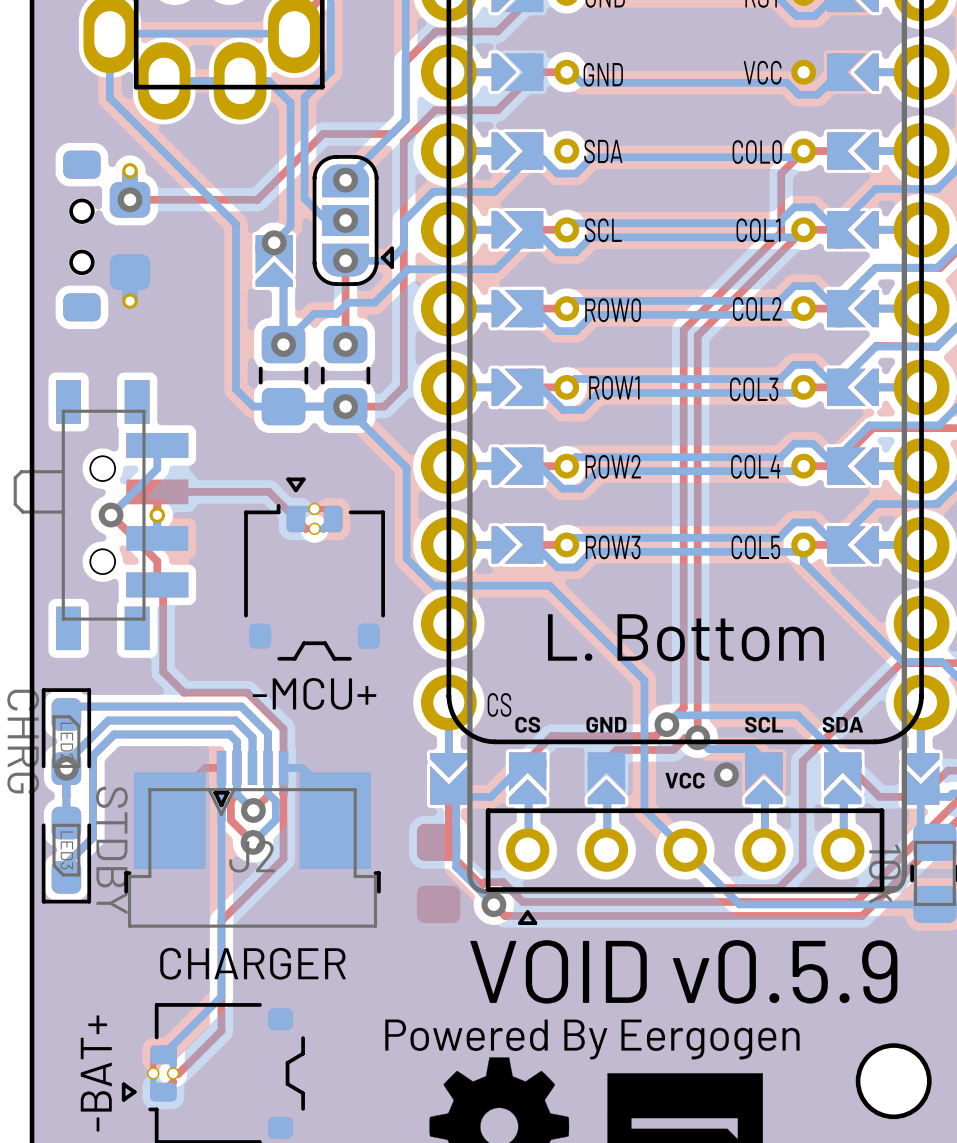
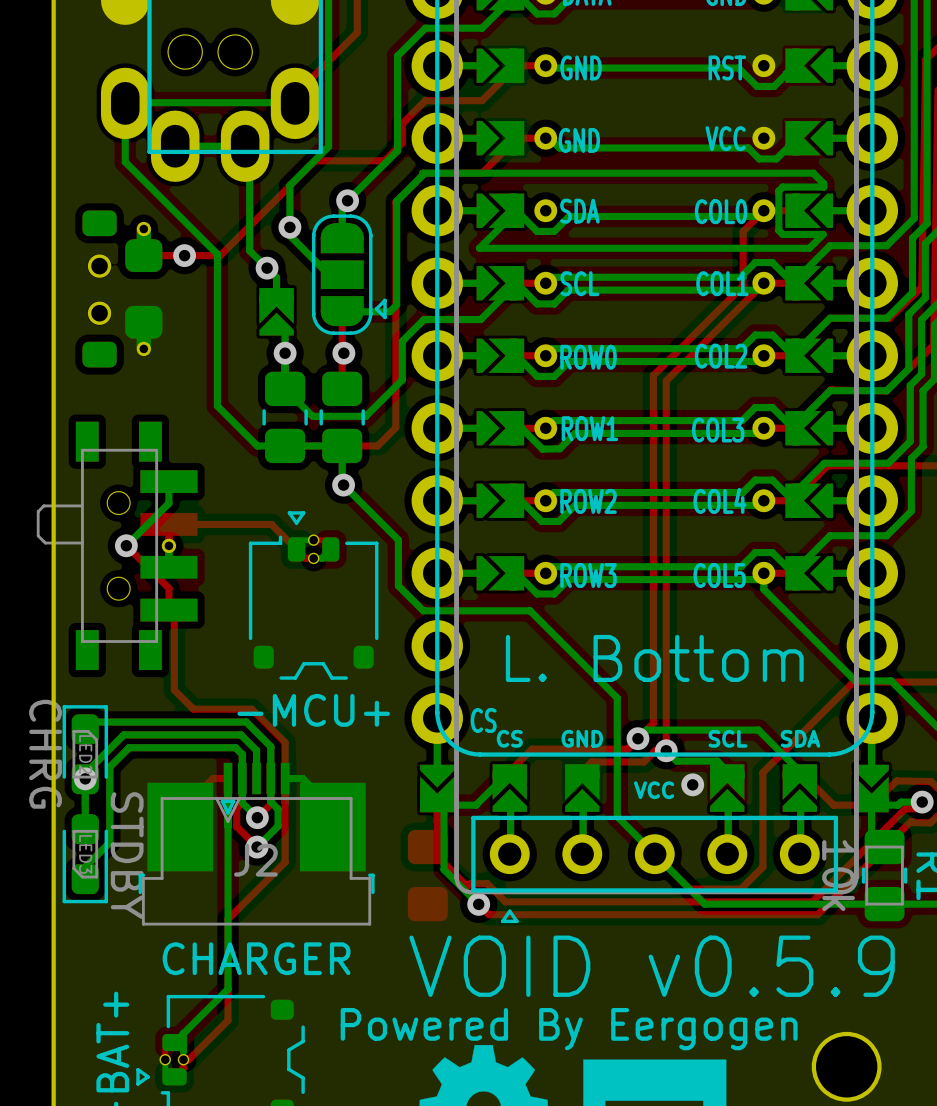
top track: (435, 31) (405, 61) (405, 120) (391, 134) (323, 134) (257, 199) (213, 199) -> (425, 100) (402, 123) (402, 143) (384, 160) (315, 160) (220, 255)
bottom track: (330, 71) (304, 97) (304, 198) (326, 220) -> (328, 137) (328, 146) (289, 185) (289, 235) (328, 274) (342, 274)
bottom track: (240, 80) (268, 80) (290, 102) (290, 226) (274, 242) -> (245, 146) (249, 150) (249, 250) (276, 277) (276, 295)
bottom track: (405, 85) (405, 120) (345, 180) -> (397, 150) (342, 206) (342, 237)
via: none -> (347, 200)
via: none -> (289, 227)
via: (345, 180) -> none
bottom track: (494, 191) (433, 191) (404, 220) (404, 246) (389, 260) -> (479, 248) (809, 248) (823, 234) (782, 234) (778, 230) (778, 190) (782, 187) (823, 187) (823, 183) (813, 173) (422, 173) (396, 201) (396, 304) (389, 311) (382, 311)
bottom track: (209, 198) (236, 224) (236, 389) (253, 406) -> (217, 254) (217, 406) (257, 445)
via position: (130, 199) -> (184, 255)
via: (345, 220) -> none
via position: (274, 242) -> (267, 268)
via: (345, 260) -> none
bottom track: (434, 269) (408, 269) (374, 302) (347, 302) (336, 313) (314, 313) (283, 344) -> (424, 319) (402, 341) (402, 379) (365, 416) (312, 416) (285, 388)
via: none -> (285, 353)
via: none -> (343, 353)
via: (283, 344) -> none
via: (345, 344) -> none
bottom track: (345, 406) (406, 467) (406, 508) -> (342, 445) (342, 483) (398, 539)
via position: (345, 406) -> (343, 485)

